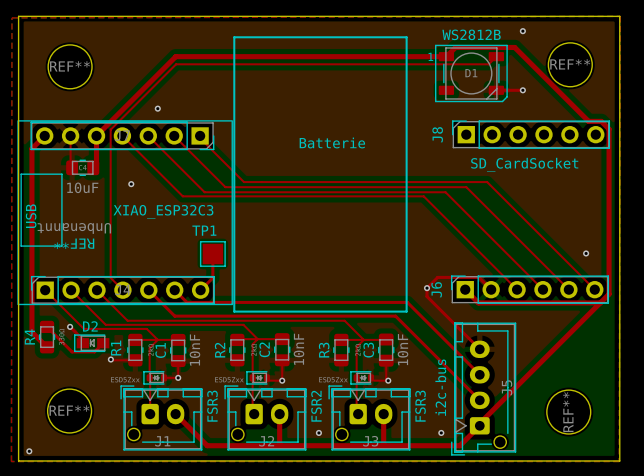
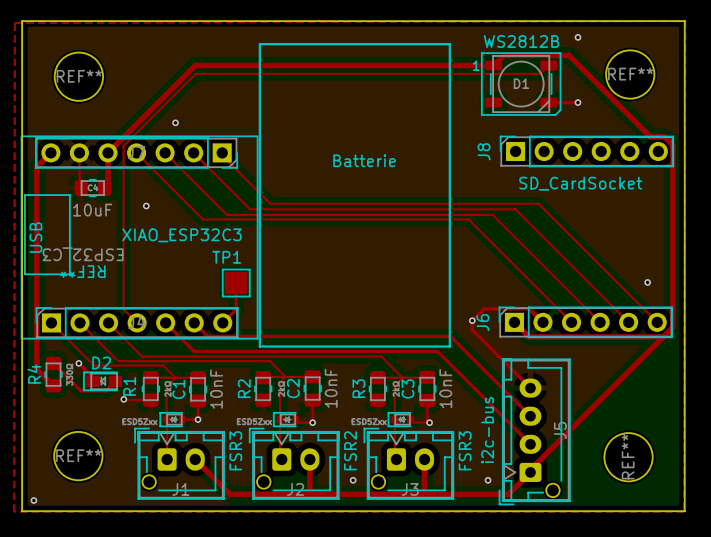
REF** value: Unbenannt (74, 228) -> ESP32_C3 (83, 254)

